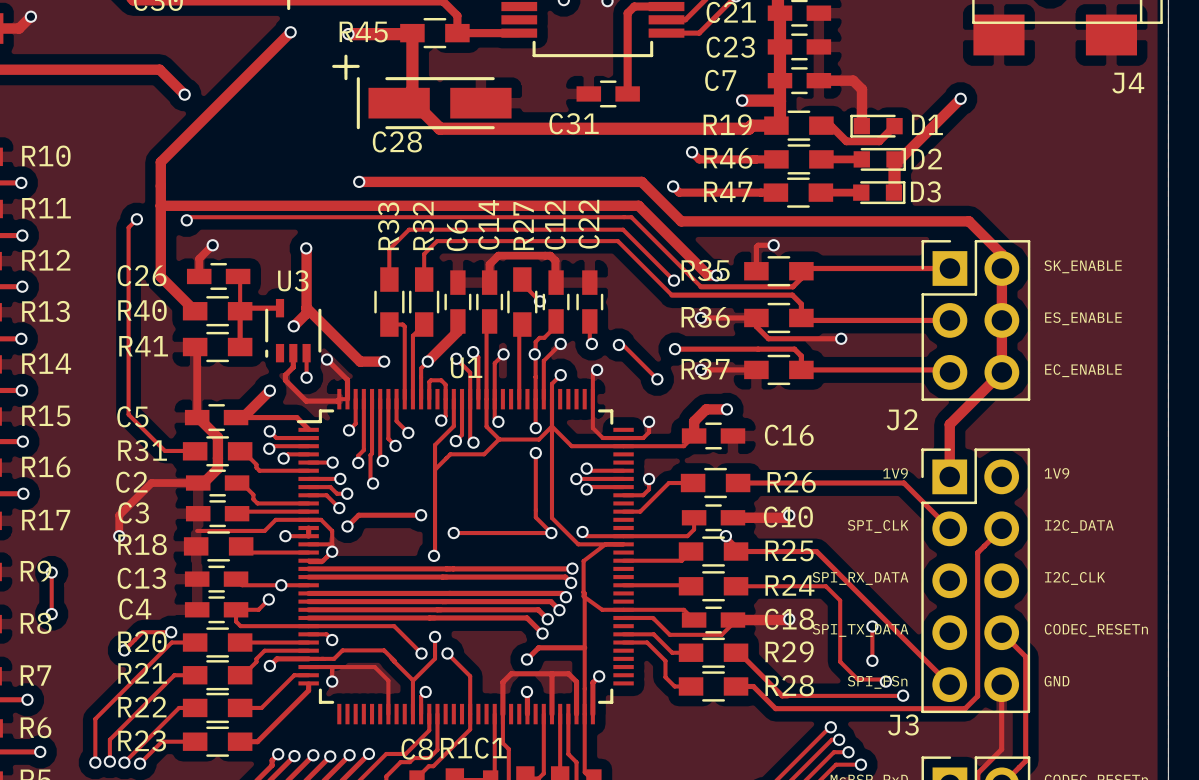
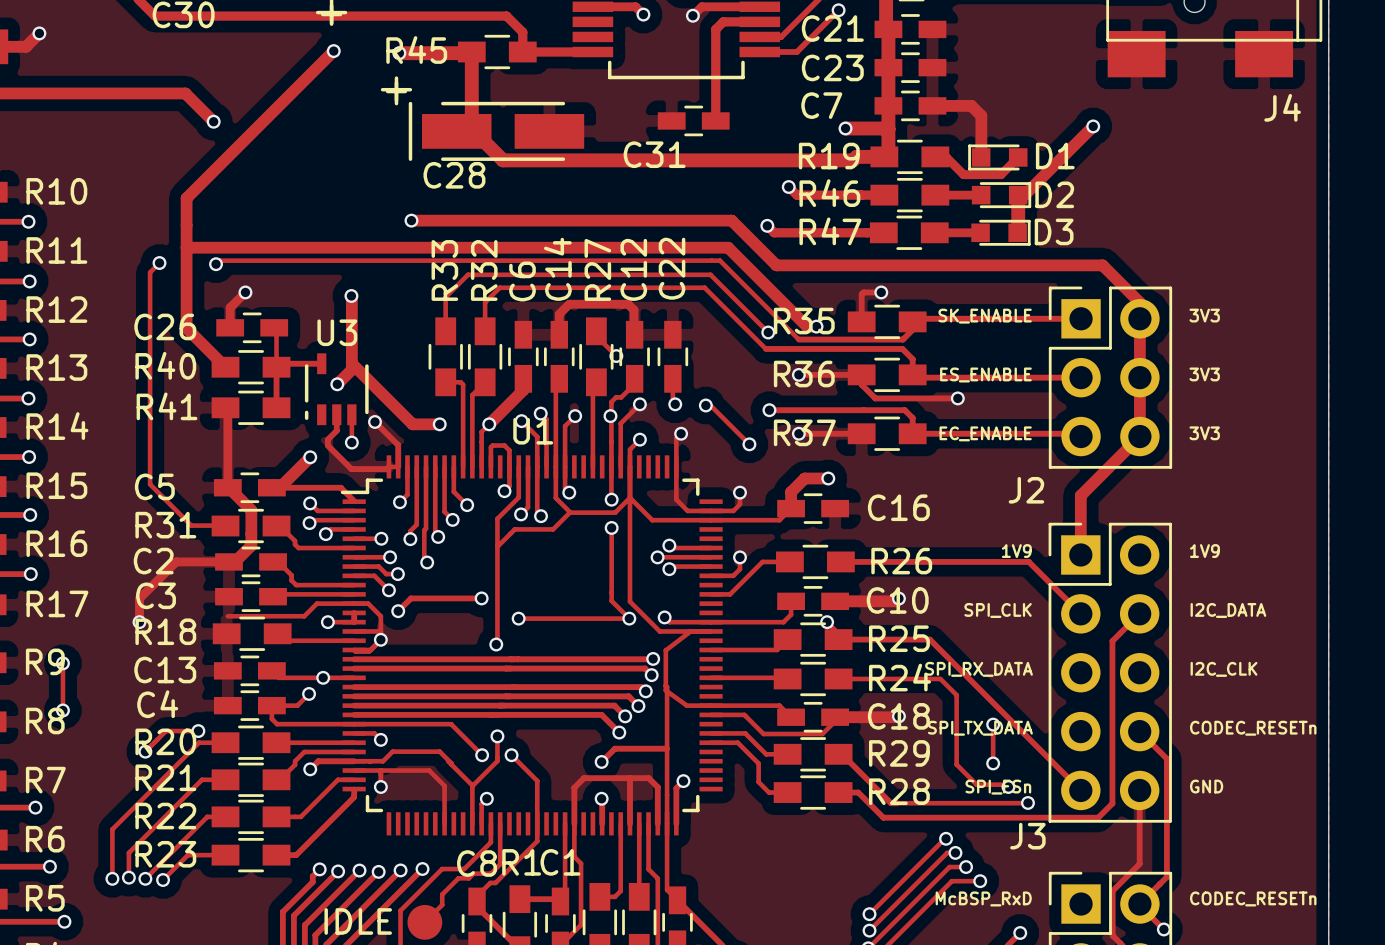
text: none -> SK_ENABLE (985, 316)
text: SK_ENABLE (1083, 266) -> 3V3 (1204, 315)
text: none -> ES_ENABLE (985, 375)
text: ES_ENABLE (1083, 318) -> 3V3 (1204, 374)
text: none -> EC_ENABLE (985, 433)
text: EC_ENABLE (1083, 370) -> 3V3 (1204, 433)

